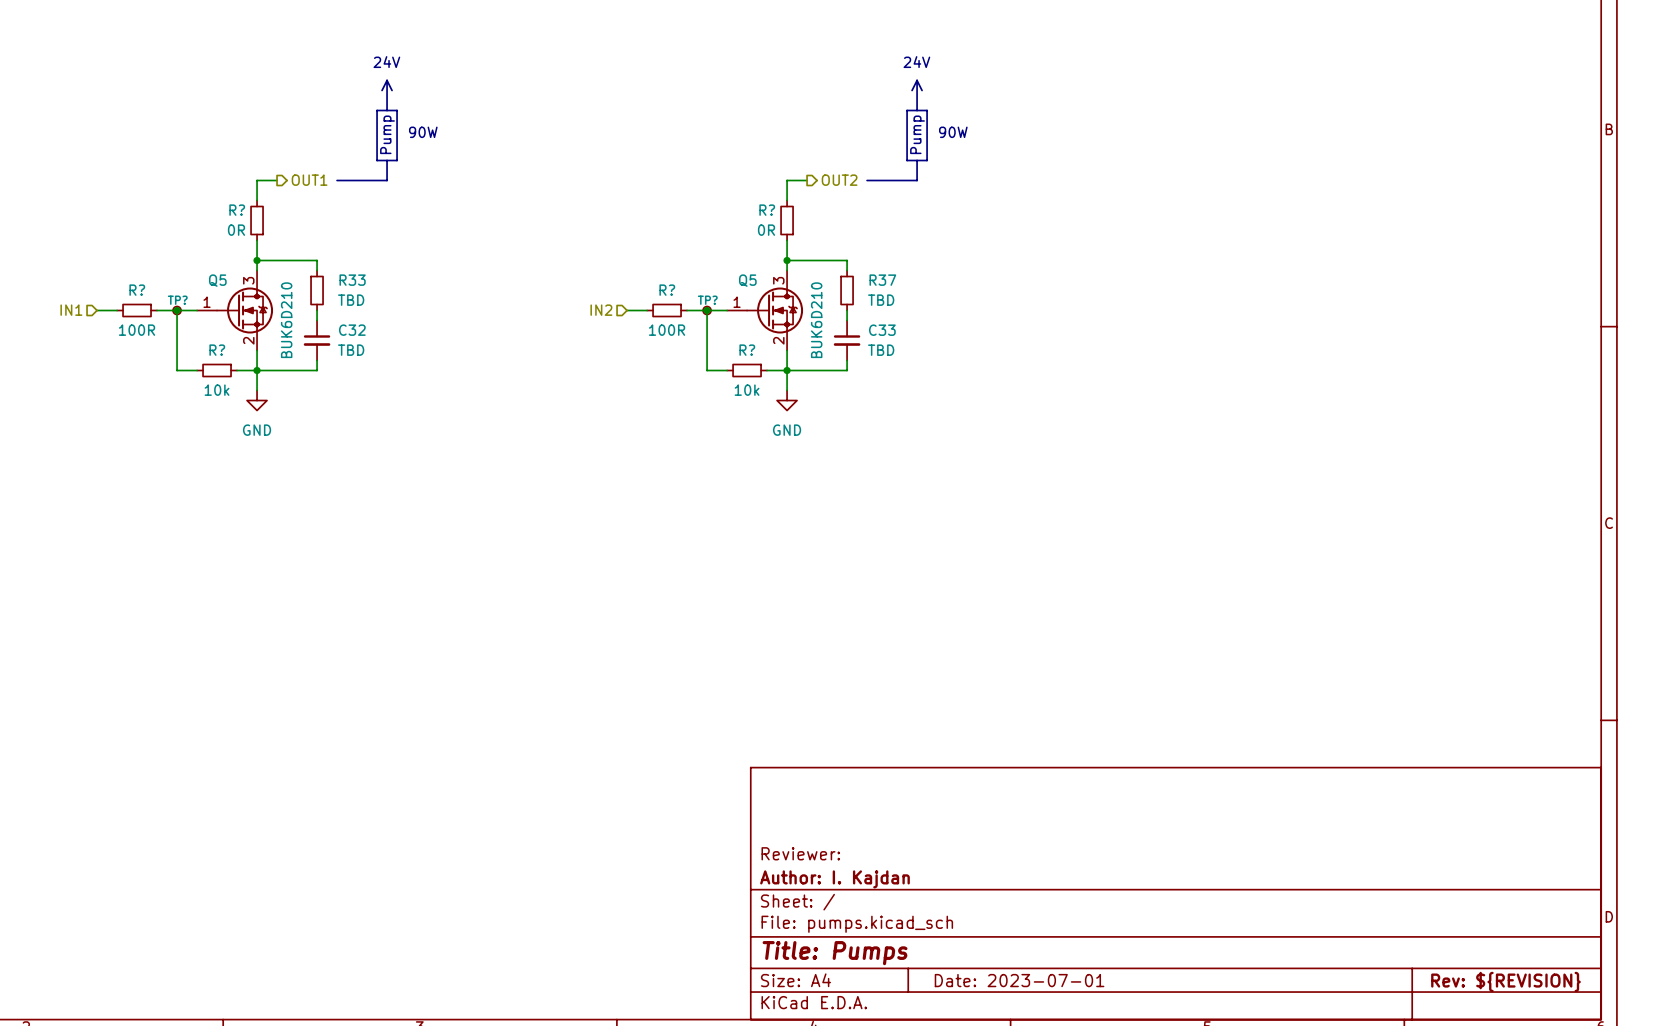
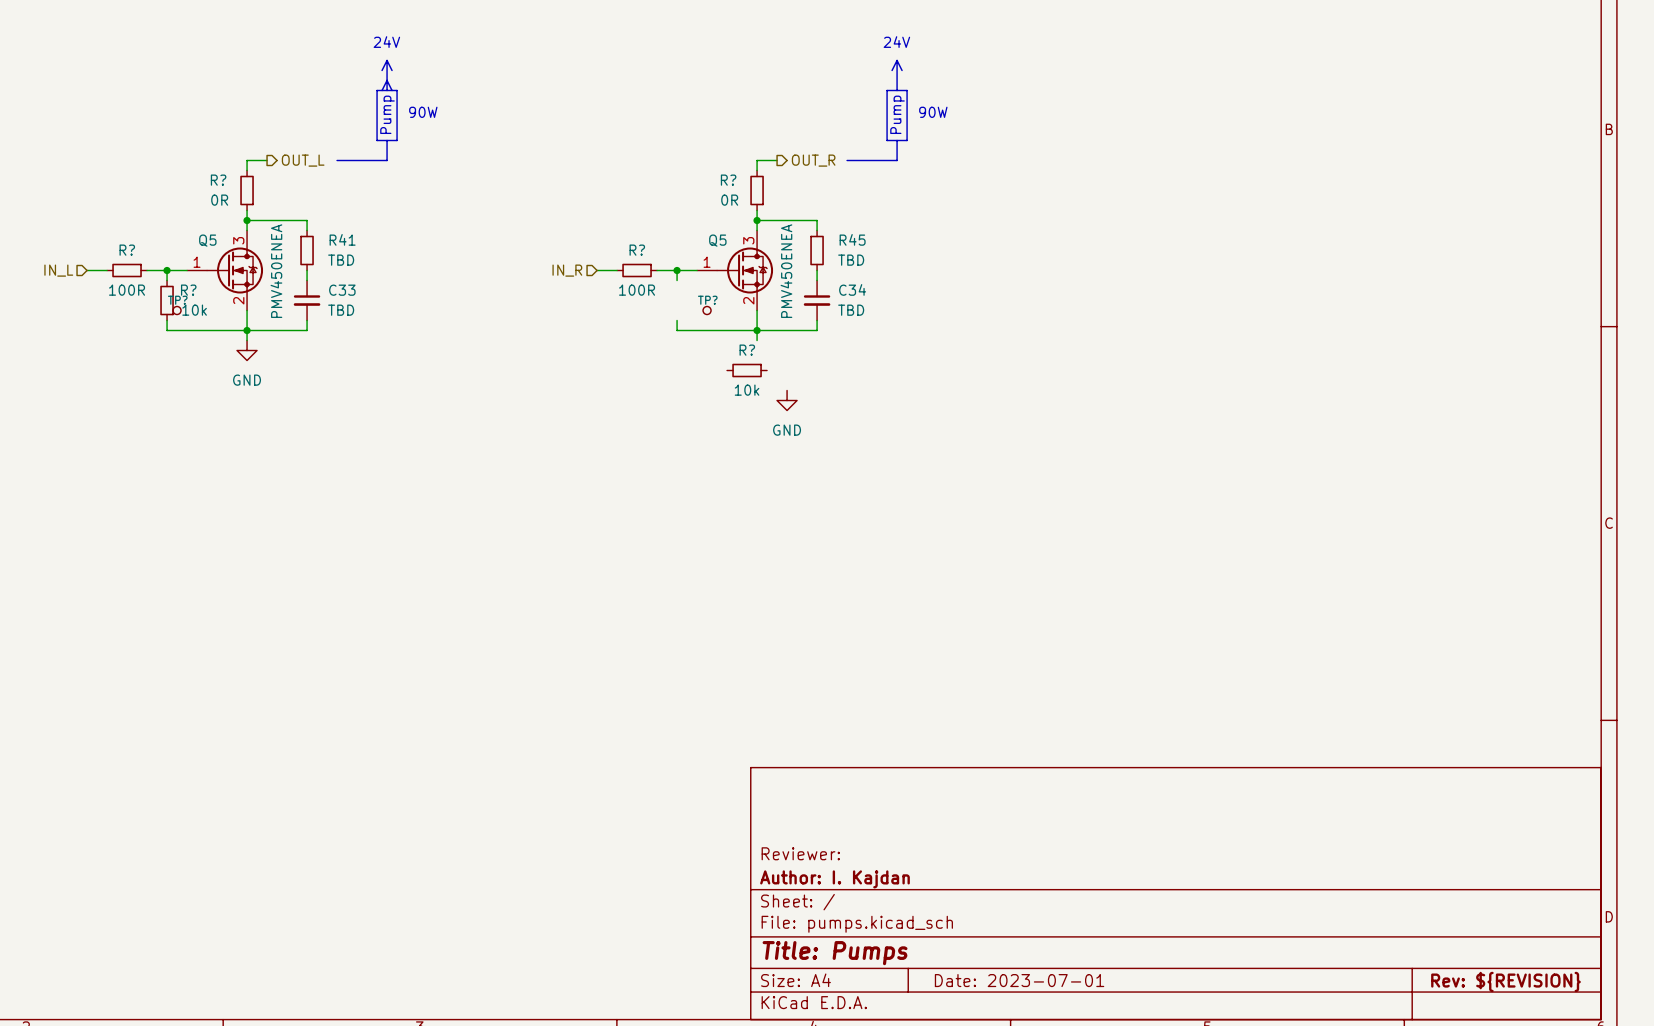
line: none -> (387, 60) (382, 70)
line: none -> (387, 60) (392, 70)
text position: 24V (386, 62) -> 24V (386, 42)
text position: 24V (916, 62) -> 24V (896, 42)
line: (917, 80) (917, 110) -> (897, 60) (897, 90)
line: (917, 80) (922, 90) -> (897, 60) (902, 70)
line: (917, 80) (912, 90) -> (897, 60) (892, 70)
line: (387, 90) (387, 110) -> (387, 60) (387, 80)
line: (377, 110) (397, 110) -> (377, 110) (377, 90) (397, 90) (397, 110)
line: (907, 110) (927, 110) (927, 160) (907, 160) (907, 140) -> (907, 110) (907, 90) (887, 90) (887, 140) (907, 140)
text position: 90W (423, 132) -> 90W (423, 112)
text position: 90W (953, 132) -> 90W (933, 112)
text position: Pump (387, 134) -> Pump (387, 114)
text position: Pump (917, 134) -> Pump (897, 114)
line: (377, 140) (377, 160) -> (377, 140) (397, 140)
line: none -> (387, 140) (387, 160)
line: (397, 140) (397, 160) (387, 160) (387, 180) (337, 180) -> none
wire: none -> (267, 160) (247, 160) (247, 170)
line: none -> (337, 160) (377, 160)
wire: none -> (777, 160) (757, 160) (757, 170)
line: (917, 160) (917, 180) (867, 180) -> (897, 140) (897, 160) (847, 160)
wire: (277, 180) (257, 180) (257, 200) -> none
hierarchical label: OUT1 (309, 180) -> OUT_L (303, 160)
wire: (807, 180) (787, 180) (787, 200) -> none
hierarchical label: OUT2 (839, 180) -> OUT_R (813, 160)
R? name position: R? (237, 210) -> R? (218, 180)
wire: none -> (247, 210) (247, 230)
wire: none -> (757, 210) (757, 230)
R? name position: R? (767, 210) -> R? (728, 180)
junction: none -> (247, 220)
R? position: (257, 220) -> (247, 190)
junction: none -> (757, 220)
R? position: (787, 220) -> (757, 190)
R? value position: 0R (236, 230) -> 0R (219, 200)
R? value position: 0R (766, 230) -> 0R (729, 200)
wire: (257, 240) (257, 270) -> (247, 310) (247, 340)
wire: (787, 240) (787, 270) -> (757, 310) (757, 340)
R41: none -> TBD (307, 250)
R45: none -> TBD (817, 250)
wire: (257, 260) (317, 260) (317, 270) -> (247, 220) (307, 220) (307, 230)
junction: (257, 260) -> none
wire: (787, 260) (847, 260) (847, 270) -> (757, 220) (817, 220) (817, 230)
junction: (787, 260) -> none
hierarchical label: none -> IN_L (58, 270)
wire: none -> (167, 270) (167, 280)
junction: none -> (167, 270)
Q5: none -> PMV450ENEA (225, 270)
hierarchical label: none -> IN_R (567, 270)
wire: none -> (677, 270) (677, 280)
junction: none -> (677, 270)
Q5: none -> PMV450ENEA (735, 270)
R33: TBD (317, 290) -> none
R37: TBD (847, 290) -> none
C34: none -> TBD (817, 300)
hierarchical label: IN1 (71, 310) -> none
wire: (97, 310) (117, 310) -> (87, 270) (107, 270)
R? position: (137, 310) -> (127, 270)
wire: (157, 310) (197, 310) -> (147, 270) (187, 270)
wire: (177, 310) (177, 370) (197, 370) -> none
junction: (177, 310) -> none
Q5: BUK6D210 (235, 310) -> none
wire: (317, 310) (317, 320) -> (307, 270) (307, 280)
hierarchical label: IN2 (601, 310) -> none
wire: (627, 310) (647, 310) -> (597, 270) (617, 270)
R? position: (667, 310) -> (637, 270)
wire: (687, 310) (727, 310) -> (657, 270) (697, 270)
wire: (707, 310) (707, 370) (727, 370) -> none
junction: (707, 310) -> none
Q5: BUK6D210 (765, 310) -> none
wire: (847, 310) (847, 320) -> (817, 270) (817, 280)
wire: none -> (167, 320) (167, 330) (307, 330) (307, 320)
wire: none -> (677, 320) (677, 330) (817, 330) (817, 320)
junction: none -> (247, 330)
junction: none -> (757, 330)
C32: TBD (317, 340) -> none
C33 position: (847, 340) -> (307, 300)
wire: (257, 350) (257, 390) -> none
wire: (787, 350) (787, 390) -> none
wire: (317, 360) (317, 370) (237, 370) -> none
wire: (847, 360) (847, 370) (767, 370) -> none
R? rotation: 0° (217, 370) -> 90° clockwise (167, 300)
R? position: (217, 370) -> (167, 300)
junction: (257, 370) -> none
junction: (787, 370) -> none
R? value position: 10k (217, 390) -> 10k (194, 310)
power symbol position: GND (257, 400) -> GND (247, 350)

